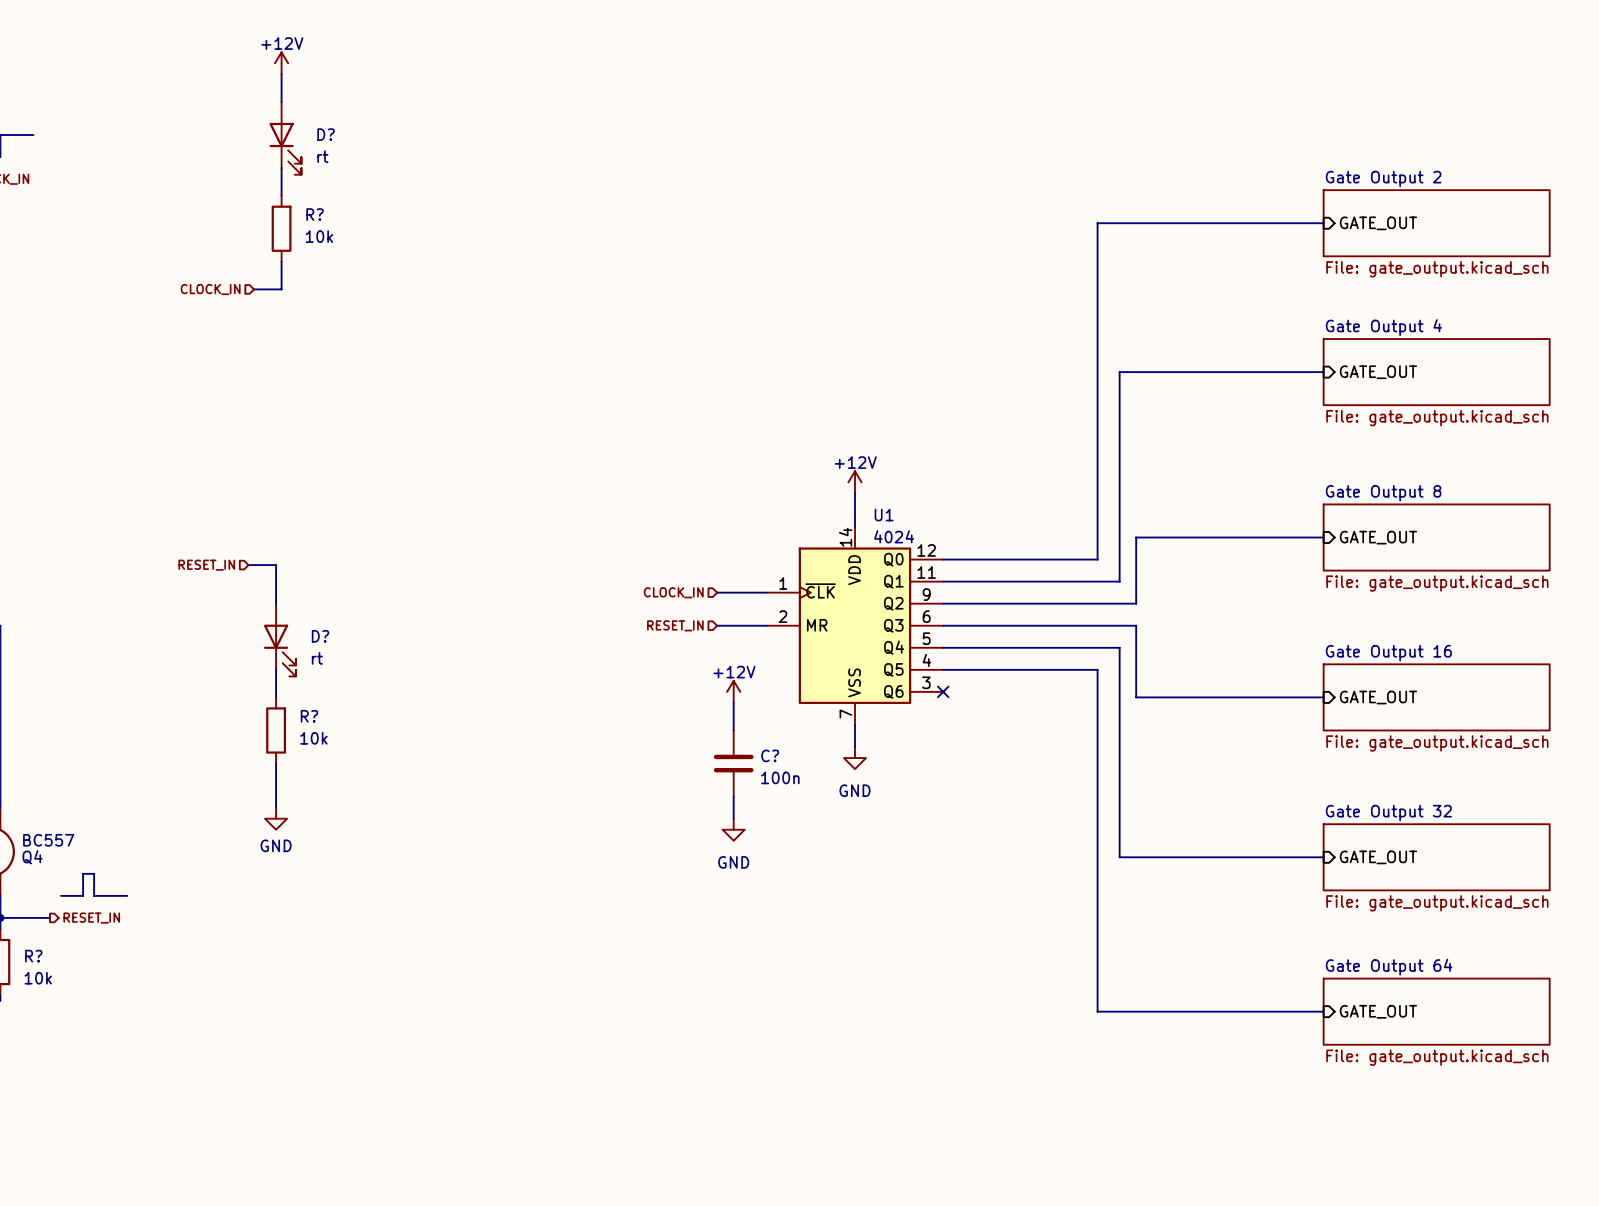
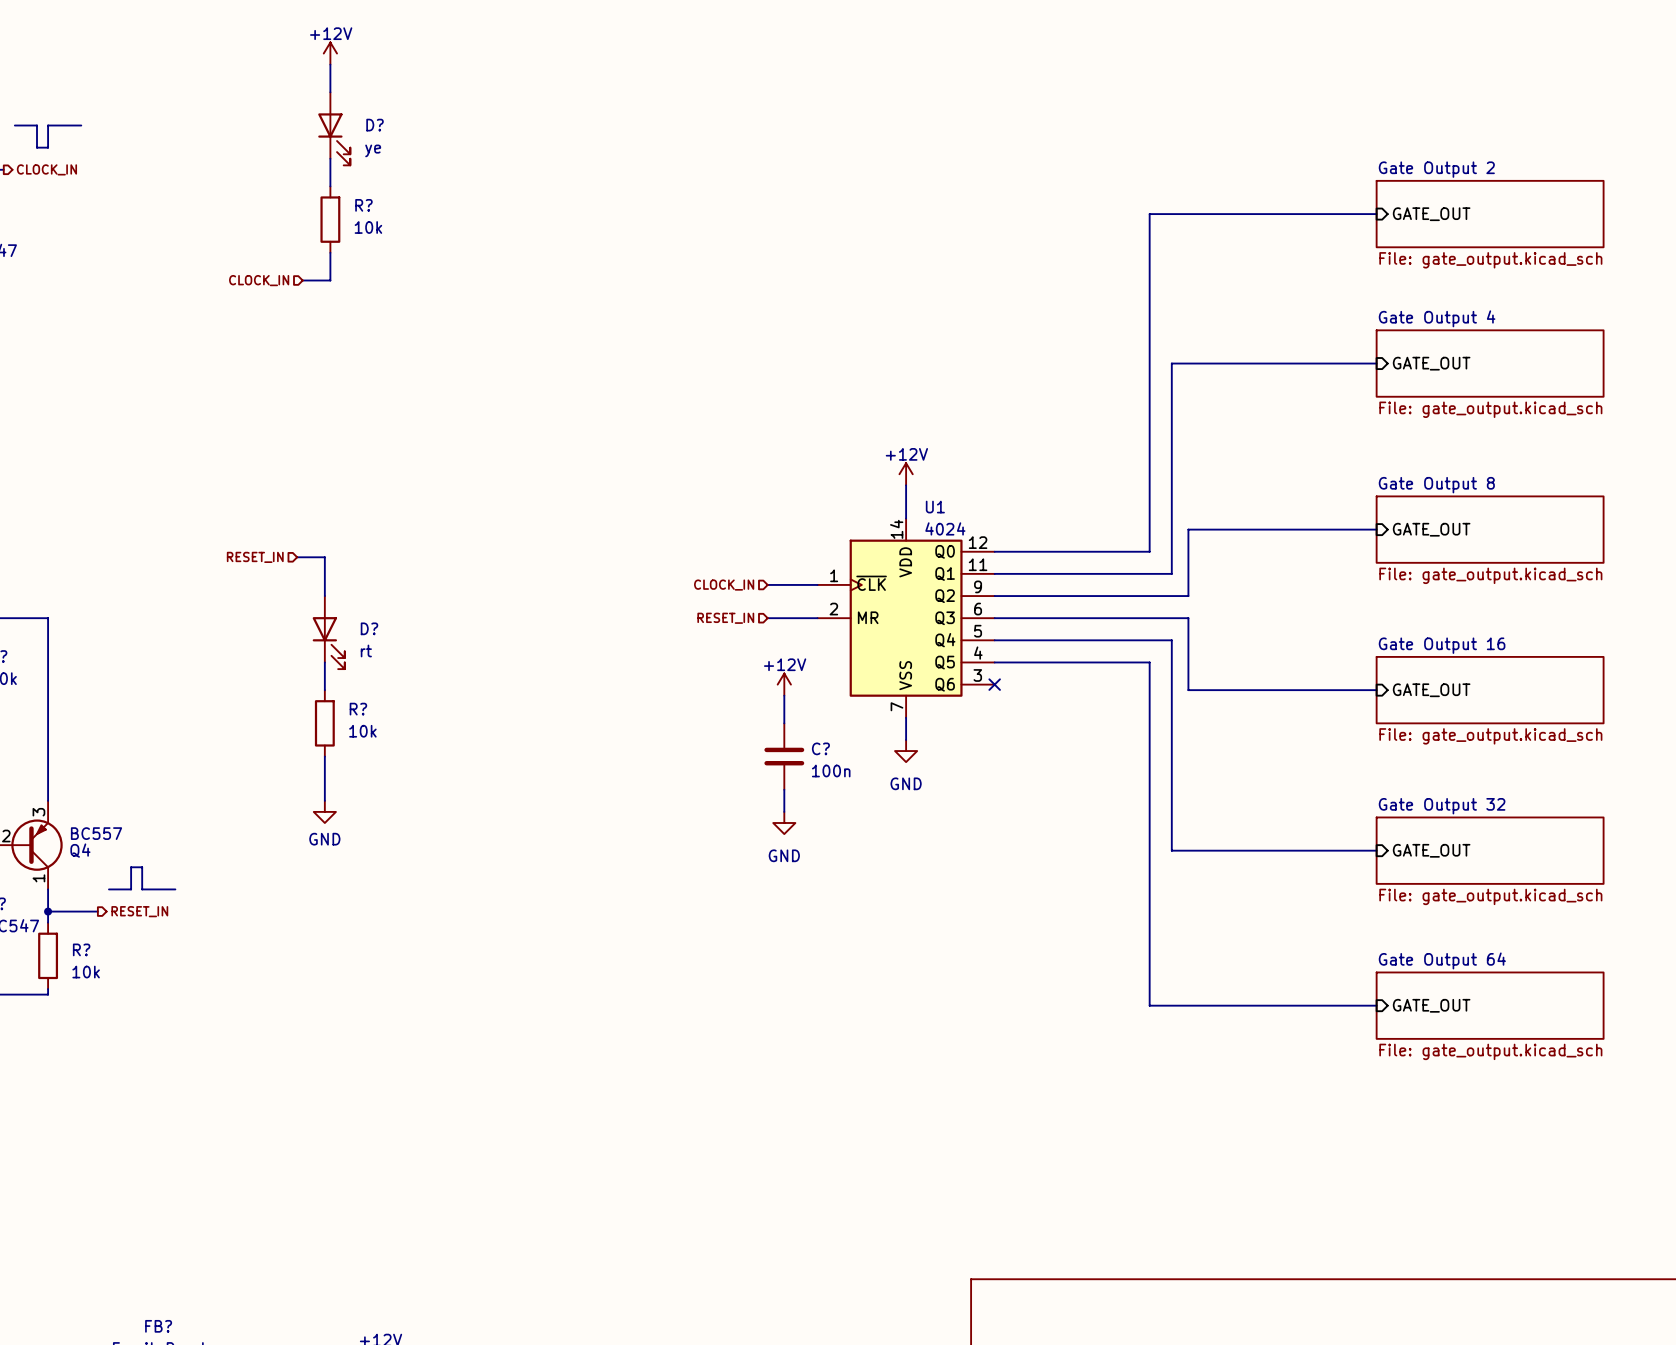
D? value: rt (322, 156) -> ye (373, 150)

